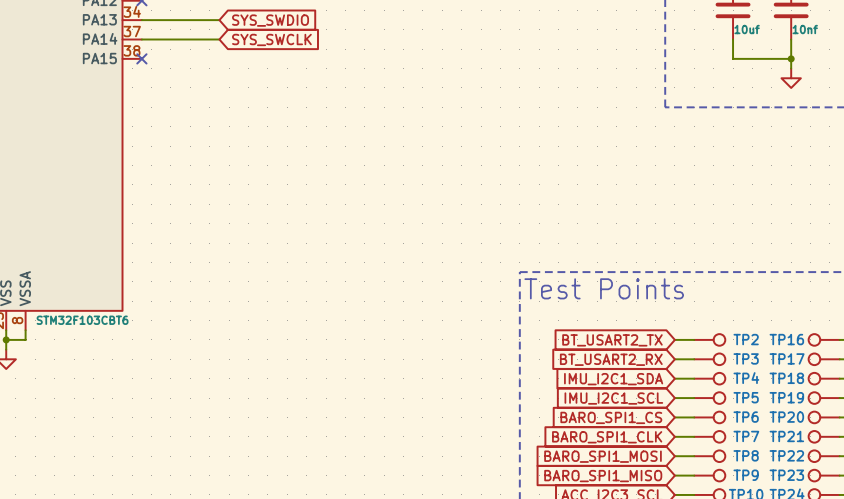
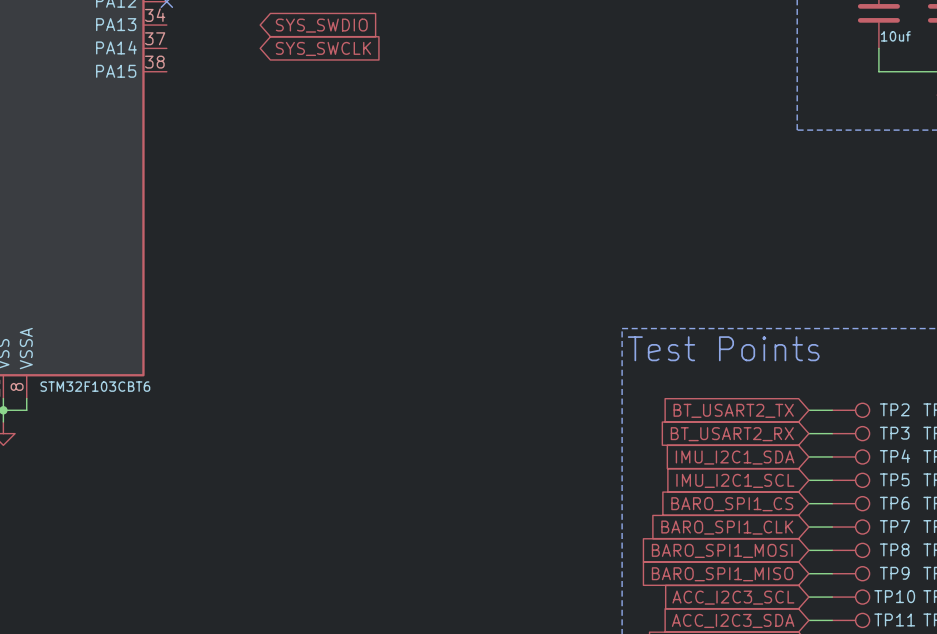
wire: (141, 20) (219, 20) -> none
wire: (141, 39) (219, 39) -> none
no-connect mark: (141, 58) -> none

